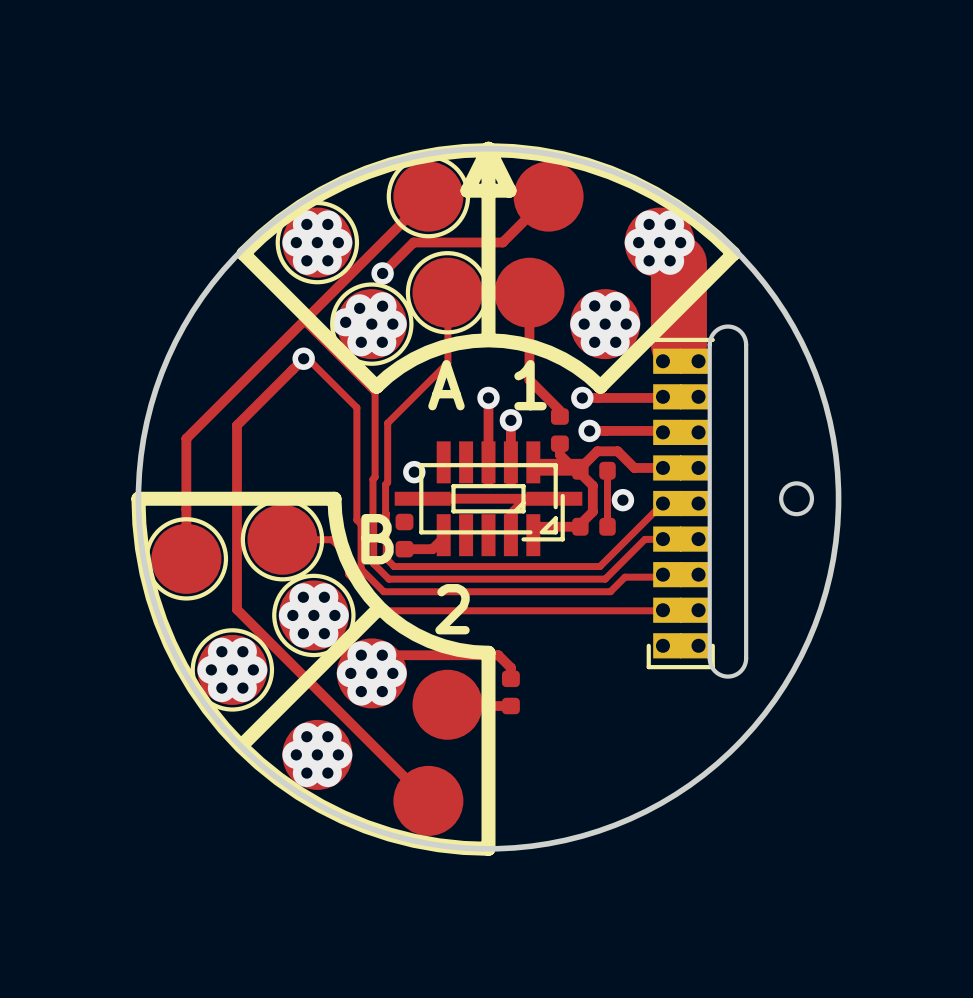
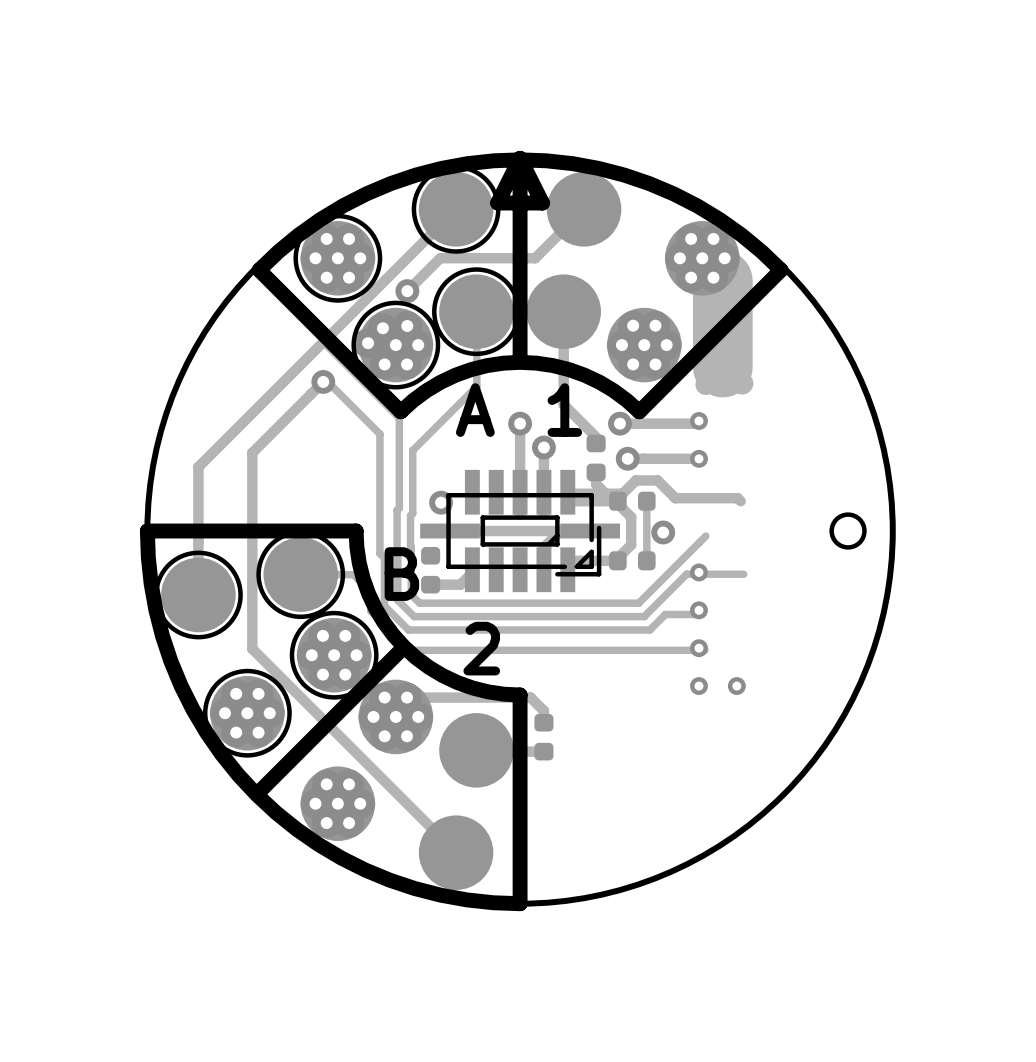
board edge: (709, 344) (709, 658) (715, 671) (727, 676) (740, 671) (746, 658) (746, 344) (740, 331) (727, 326) (715, 331) (709, 344) -> none
via: none -> (698, 420)
via: none -> (698, 458)
part: (680, 503) -> none
via: none -> (698, 572)
via: none -> (698, 610)
via: none -> (698, 648)
via: none -> (698, 686)
via: none -> (736, 686)

